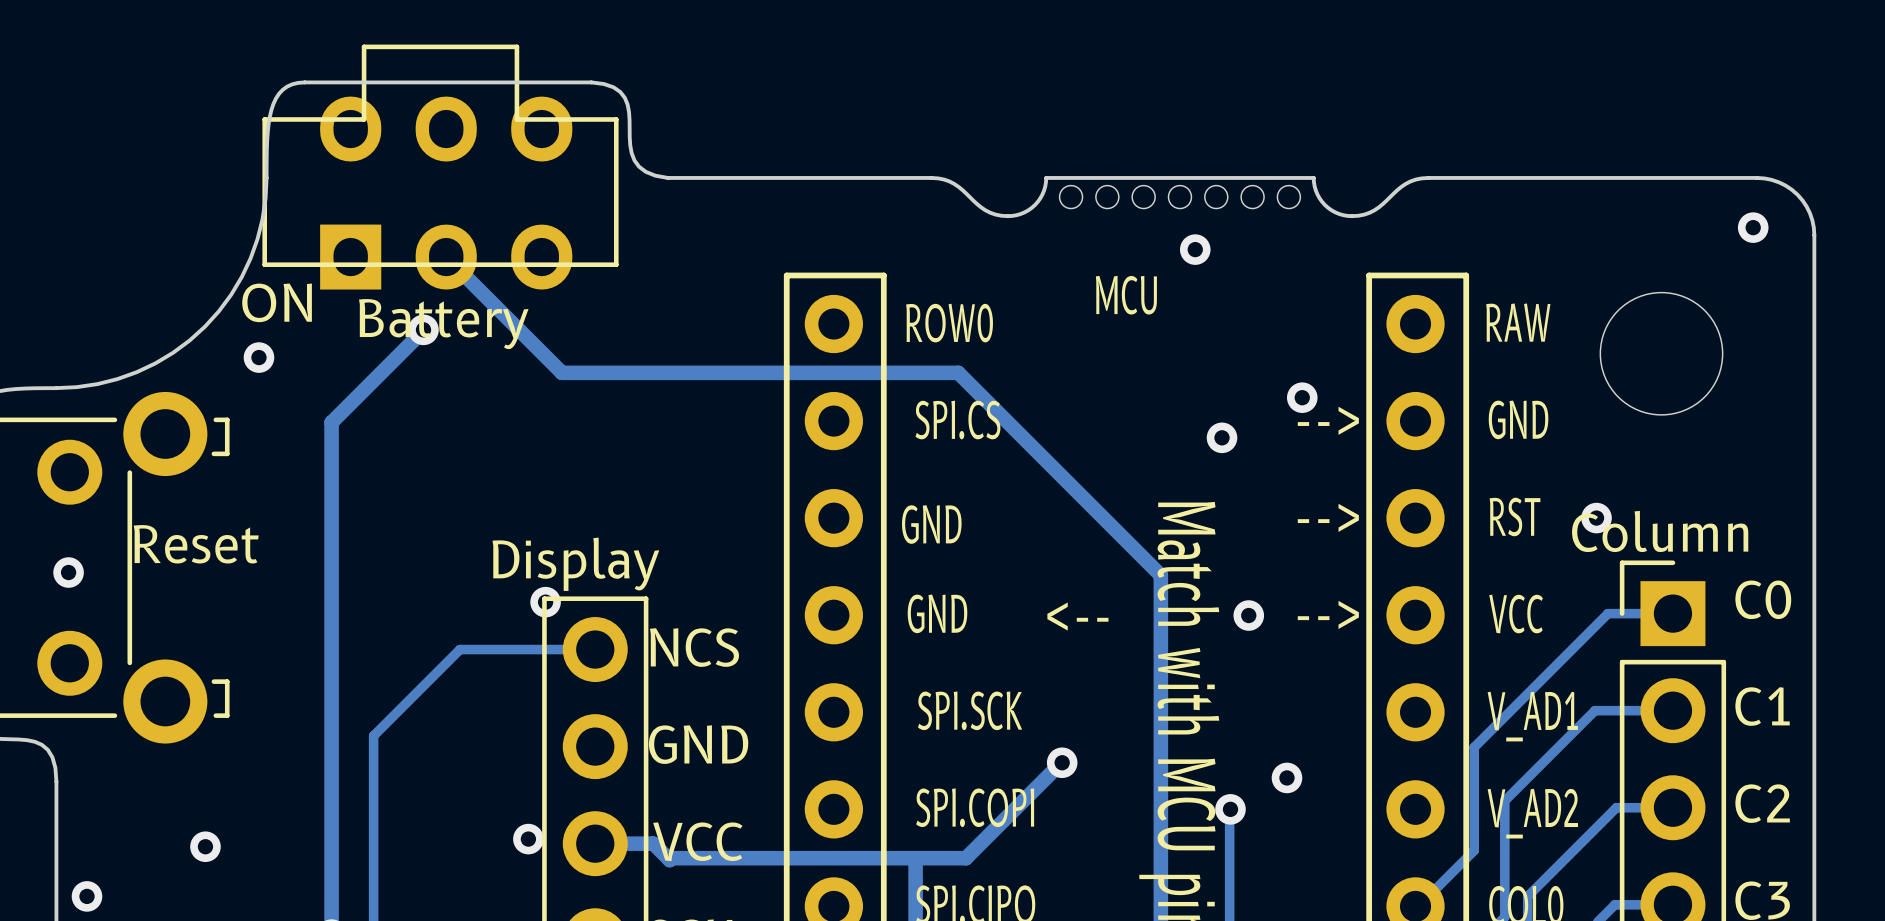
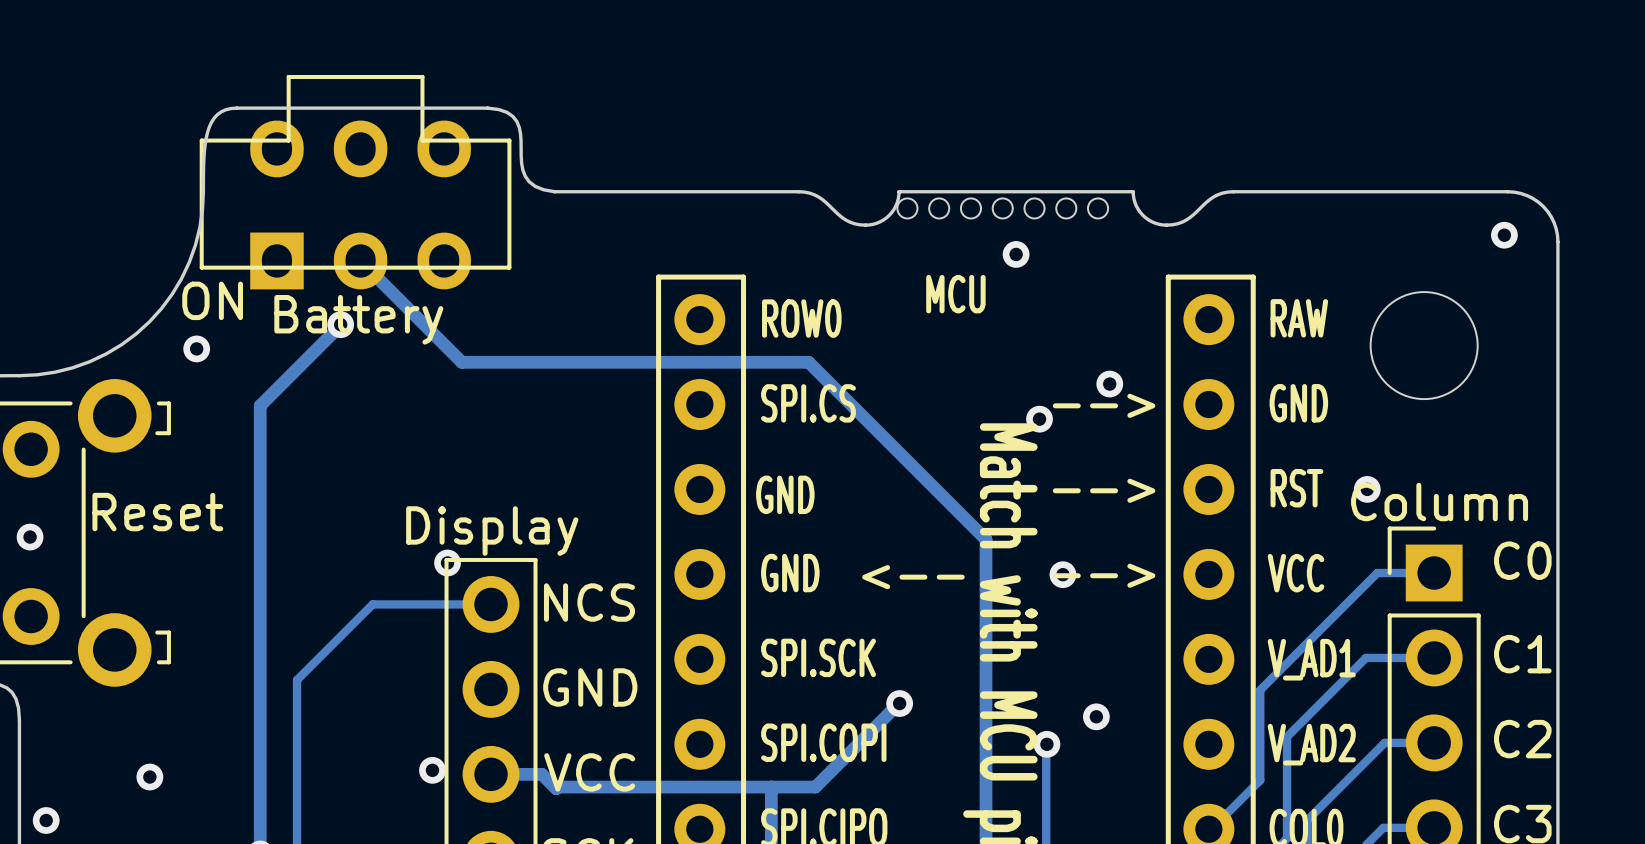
board edge: (1061, 177) (1046, 177) (1042, 194) (1035, 204) (1024, 212) (1008, 216) (990, 212) (954, 183) (944, 179) (931, 177) -> (899, 191) (897, 202) (889, 215) (876, 223) (865, 225) (845, 219) (814, 194) (804, 192) (785, 191)
board edge: (1443, 177) (1421, 178) (1410, 181) (1374, 210) (1364, 214) (1351, 216) (1335, 212) (1324, 204) (1315, 190) (1313, 177) -> (1233, 191) (1217, 194) (1186, 219) (1166, 225) (1155, 223) (1142, 215) (1135, 202) (1133, 191) (1119, 191)

